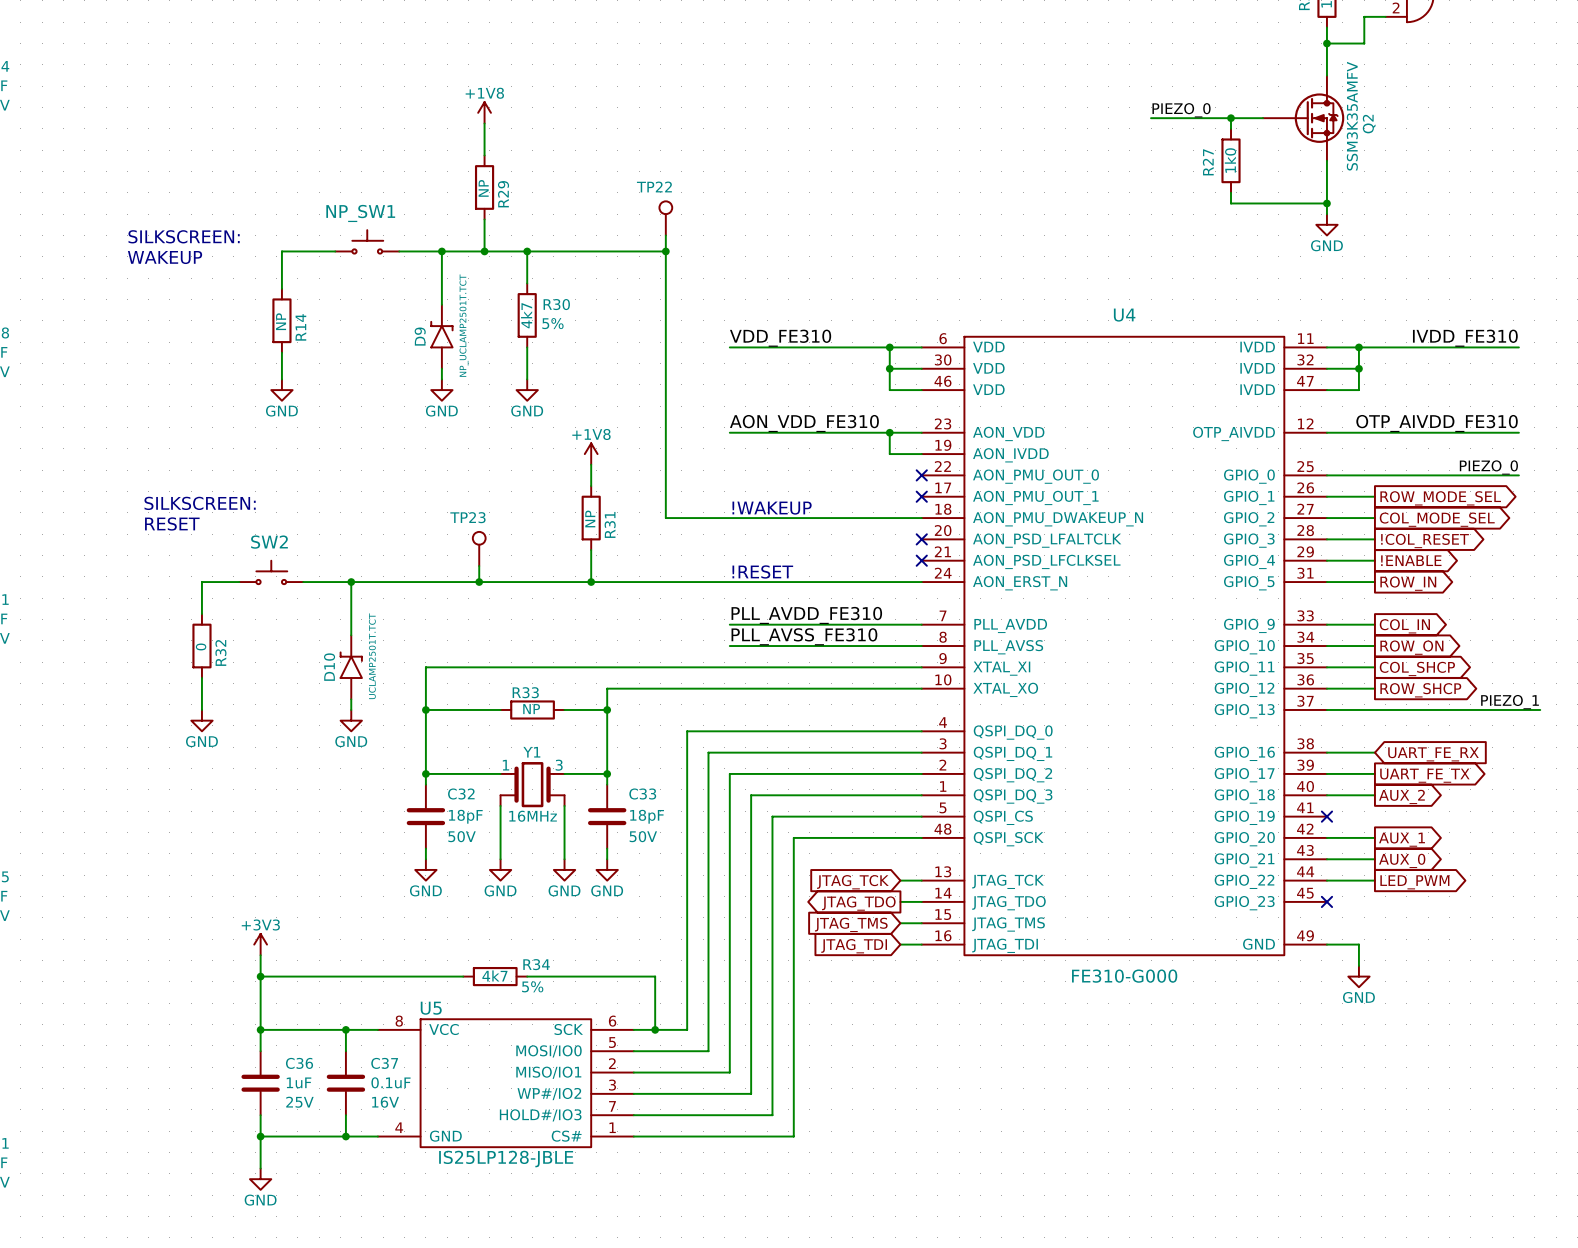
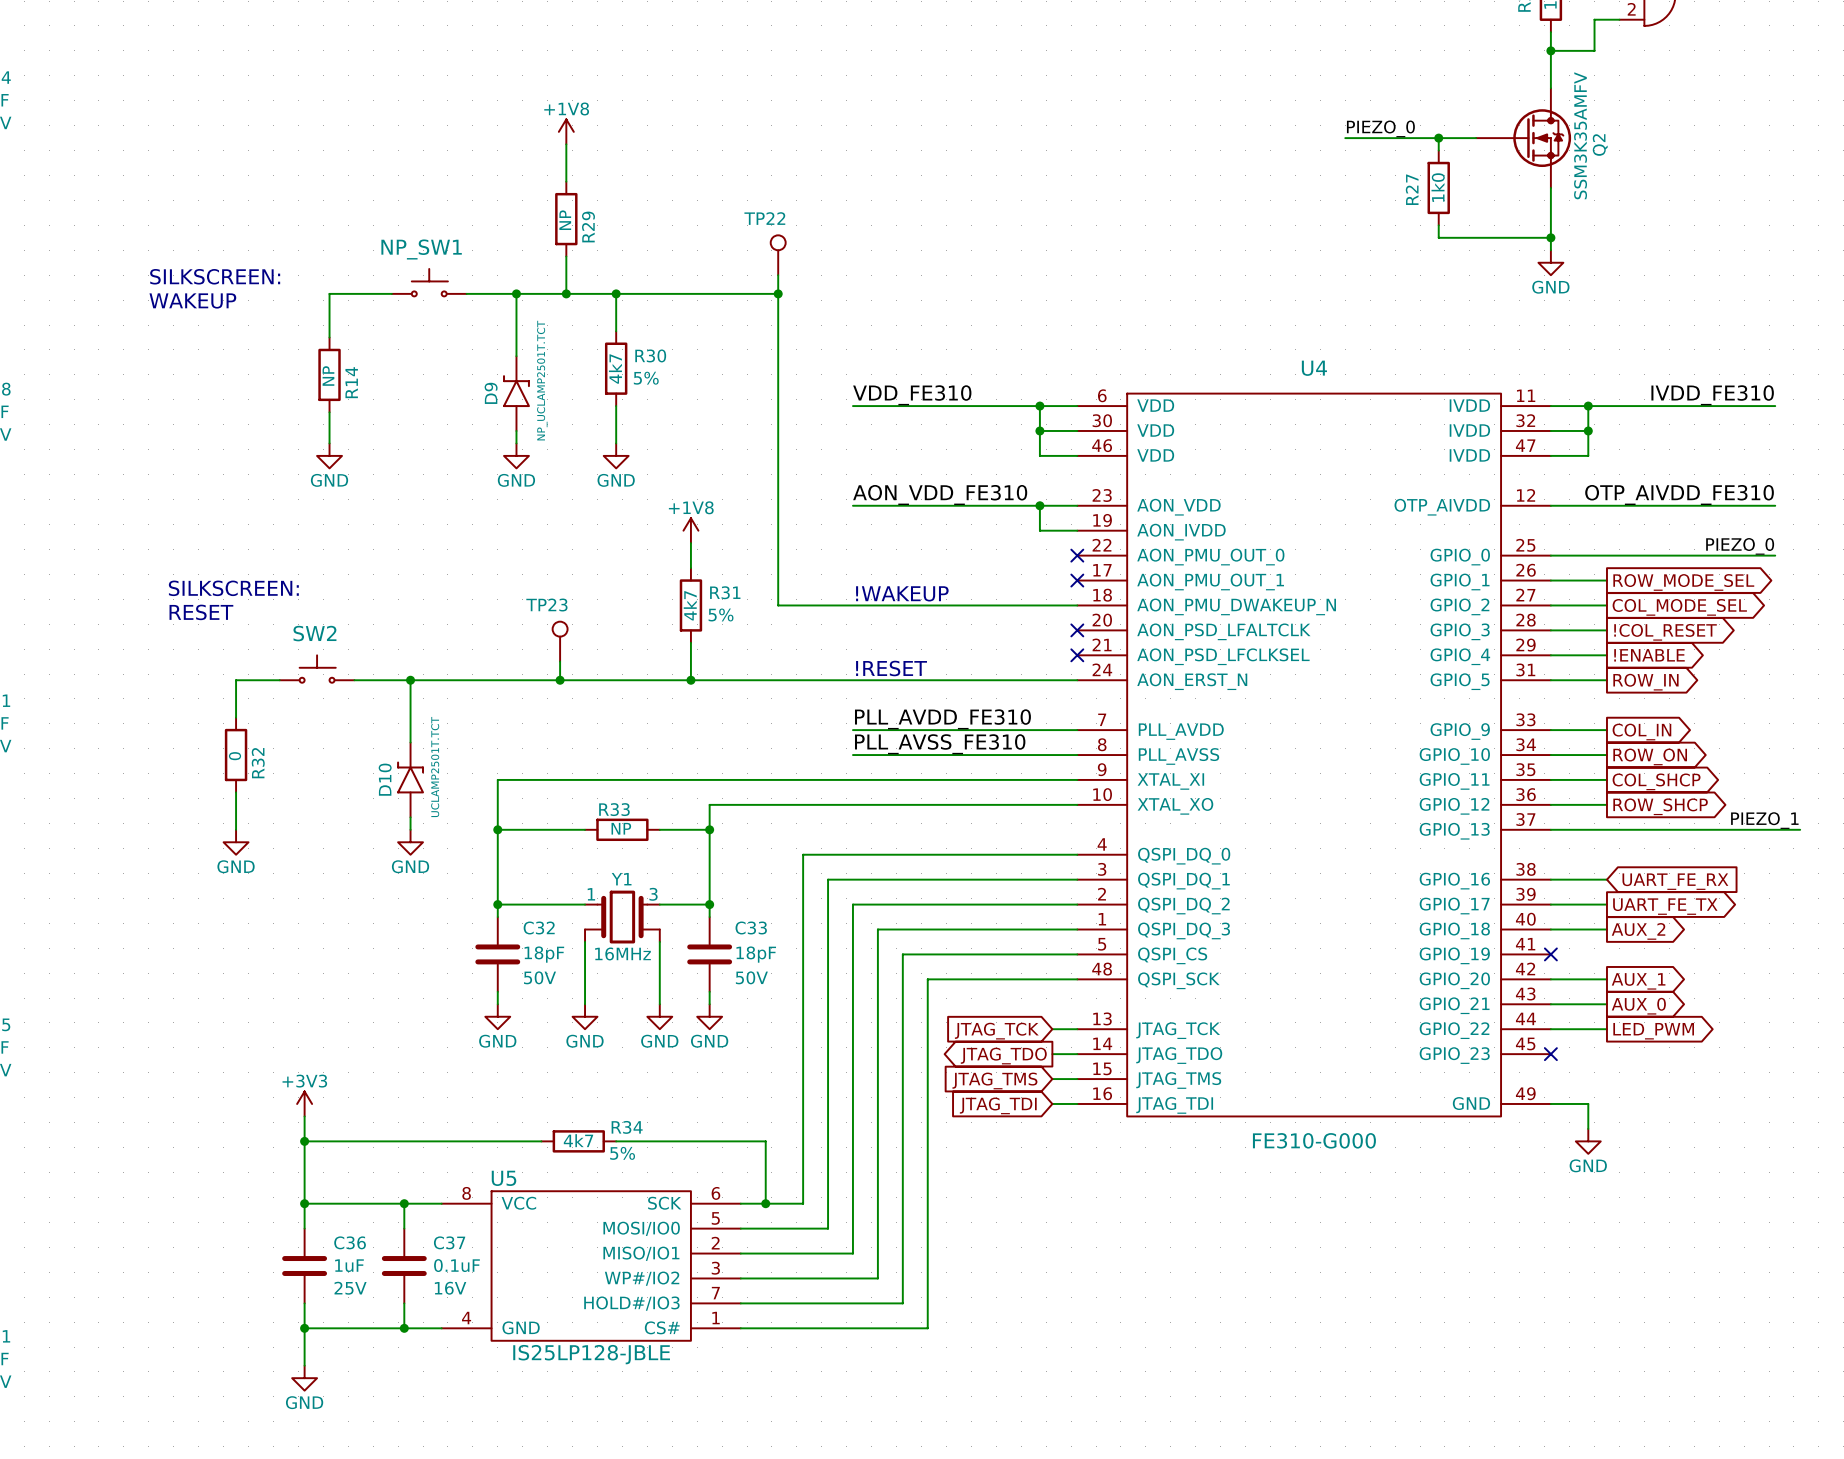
R31 text: NP (590, 518) -> none
R31 text: none -> 4k7 (690, 605)
R31 name rotation: 0° (610, 524) -> 90° clockwise (725, 592)
R31 text: none -> 5% (721, 614)

